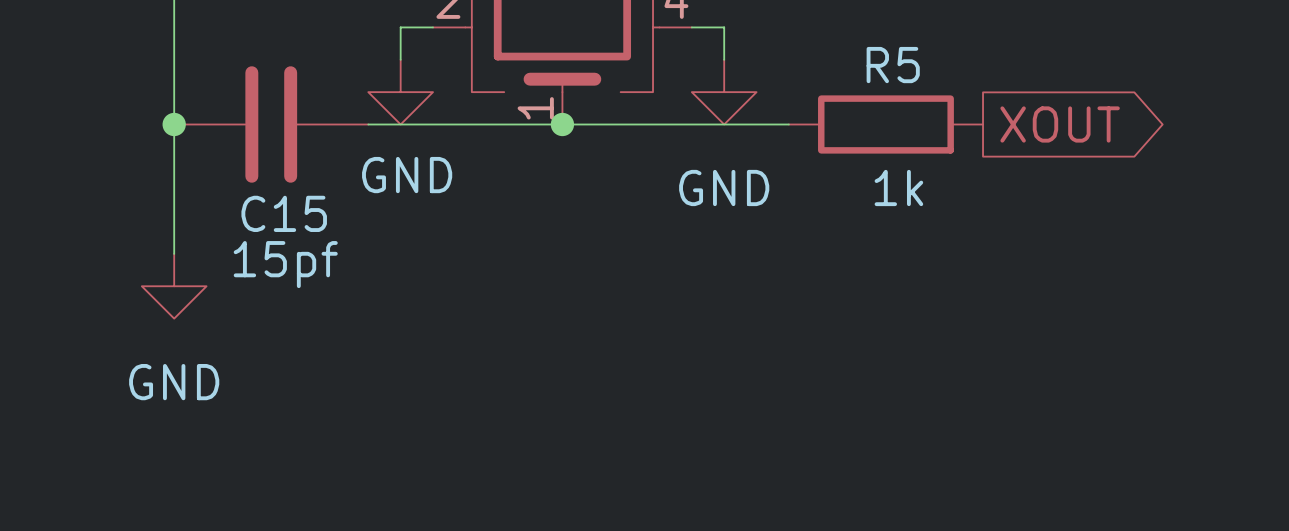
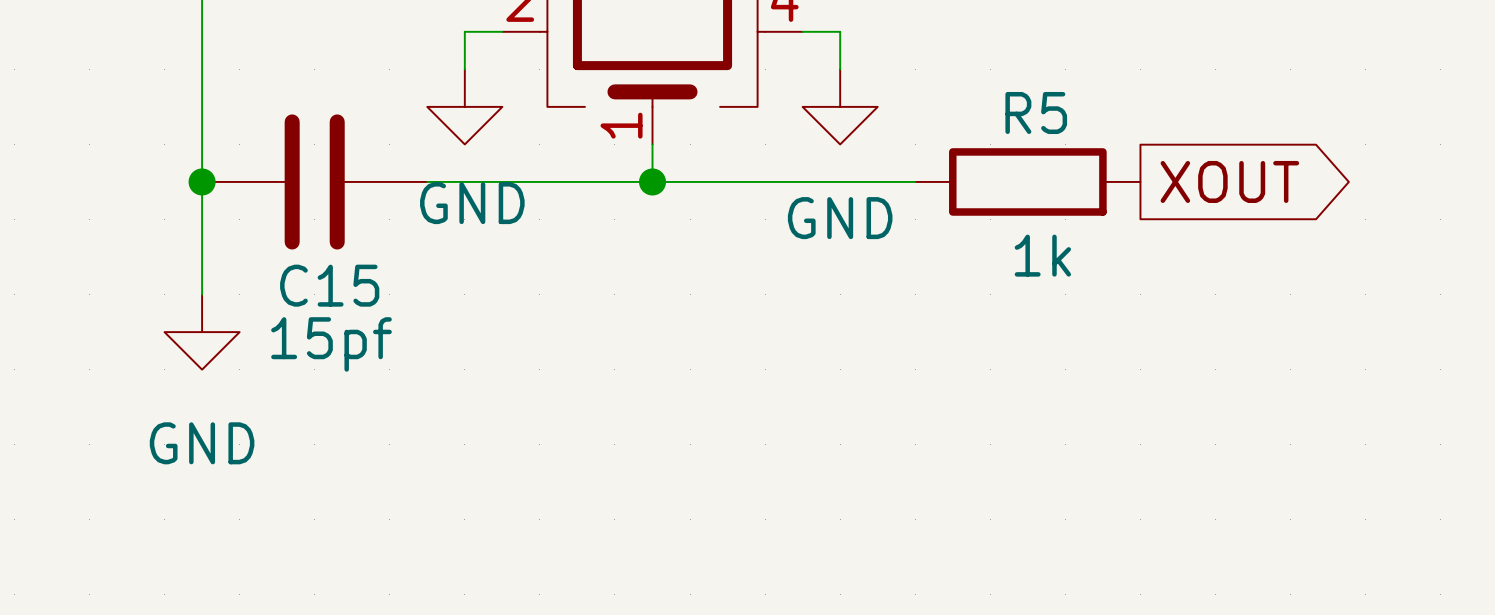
junction position: (174, 124) -> (202, 181)
C15 position: (271, 124) -> (314, 181)
wire: (368, 124) (788, 124) -> (427, 181) (915, 181)
wire: none -> (652, 144) (652, 181)
junction position: (562, 124) -> (652, 181)
R5 position: (885, 124) -> (1027, 181)
global label position: XOUT (1060, 124) -> XOUT (1229, 181)

